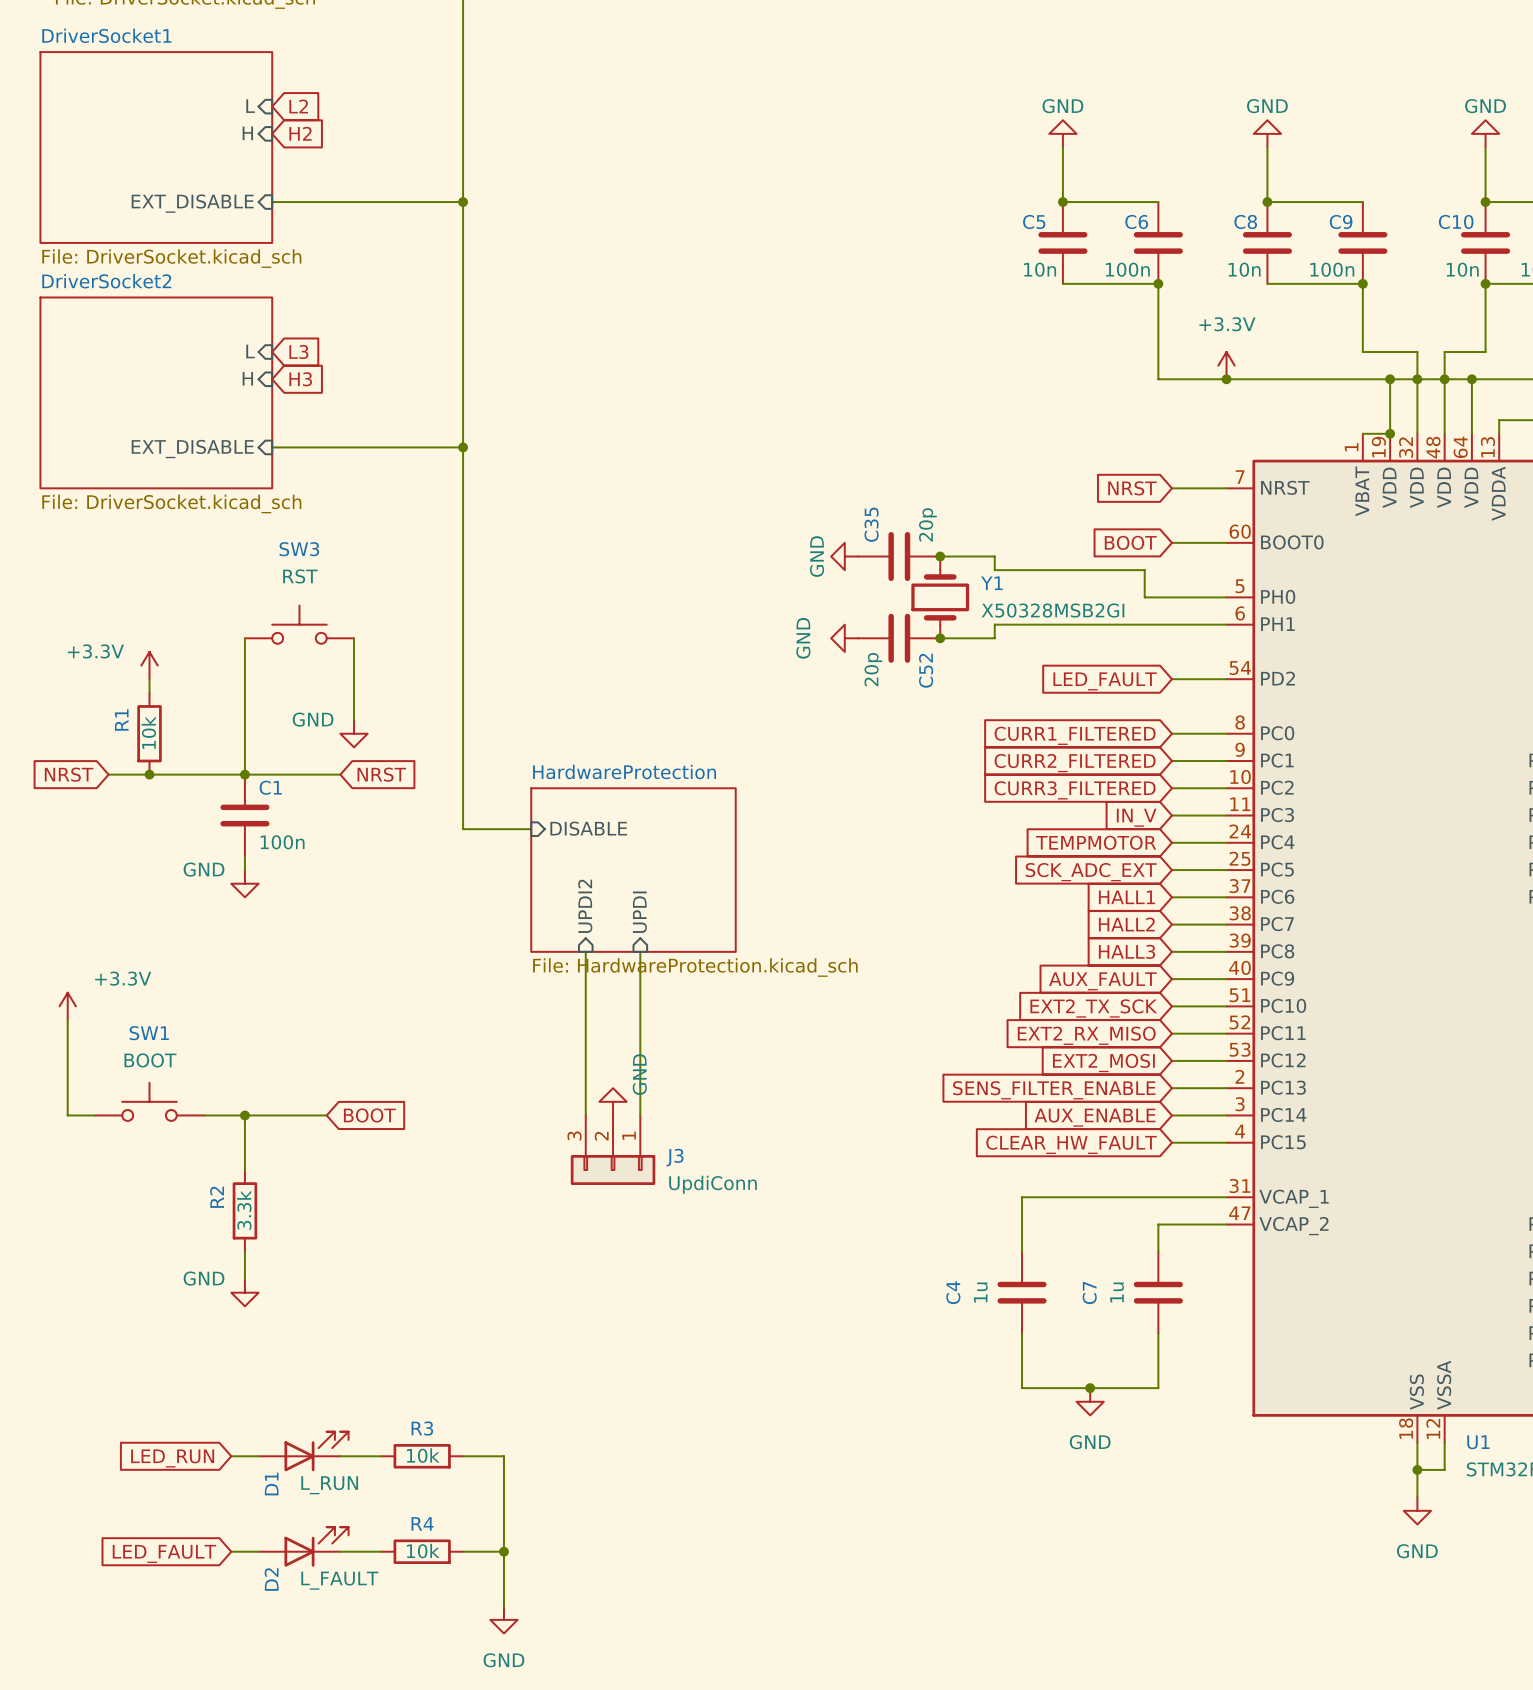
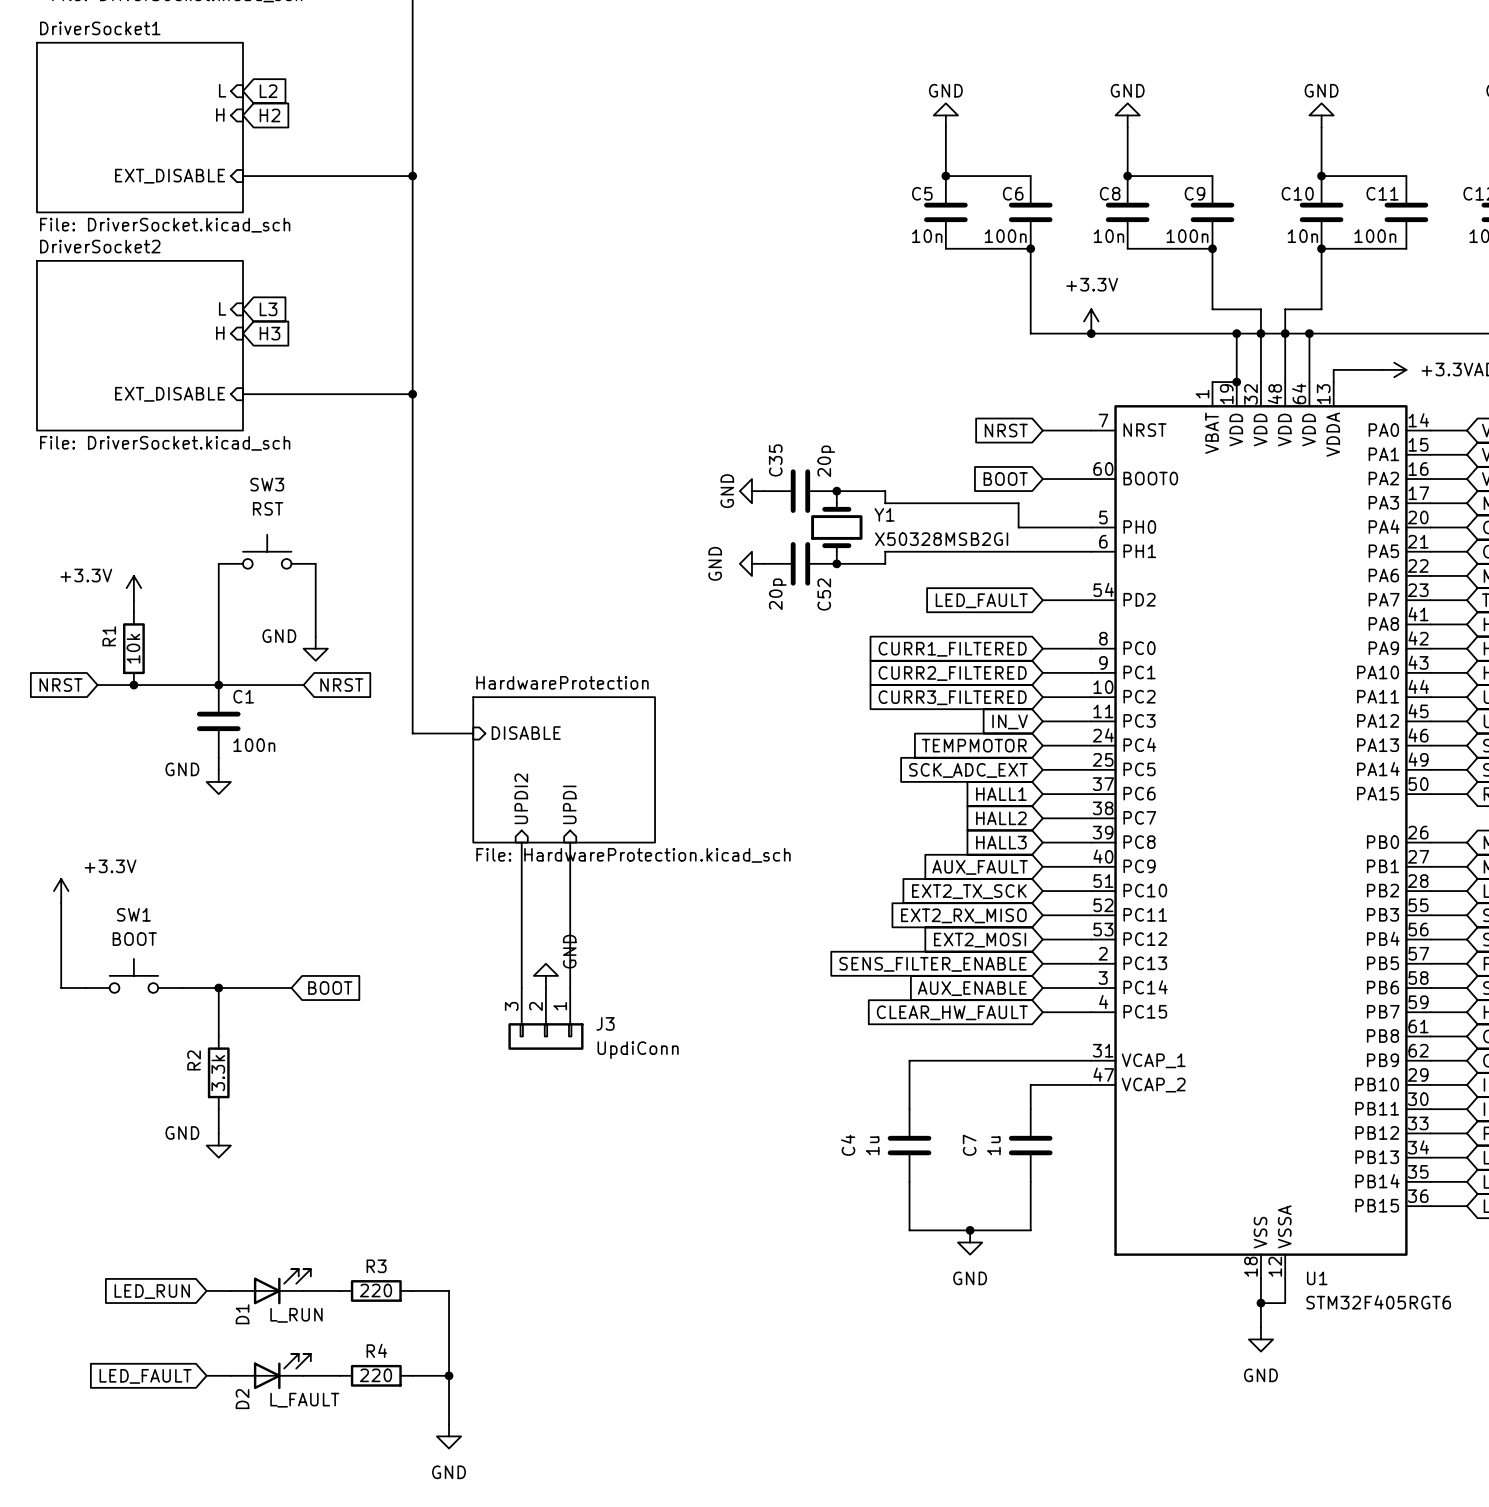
R3 value: 10k (423, 1455) -> 220 (376, 1290)
R4 value: 10k (423, 1551) -> 220 (376, 1375)

